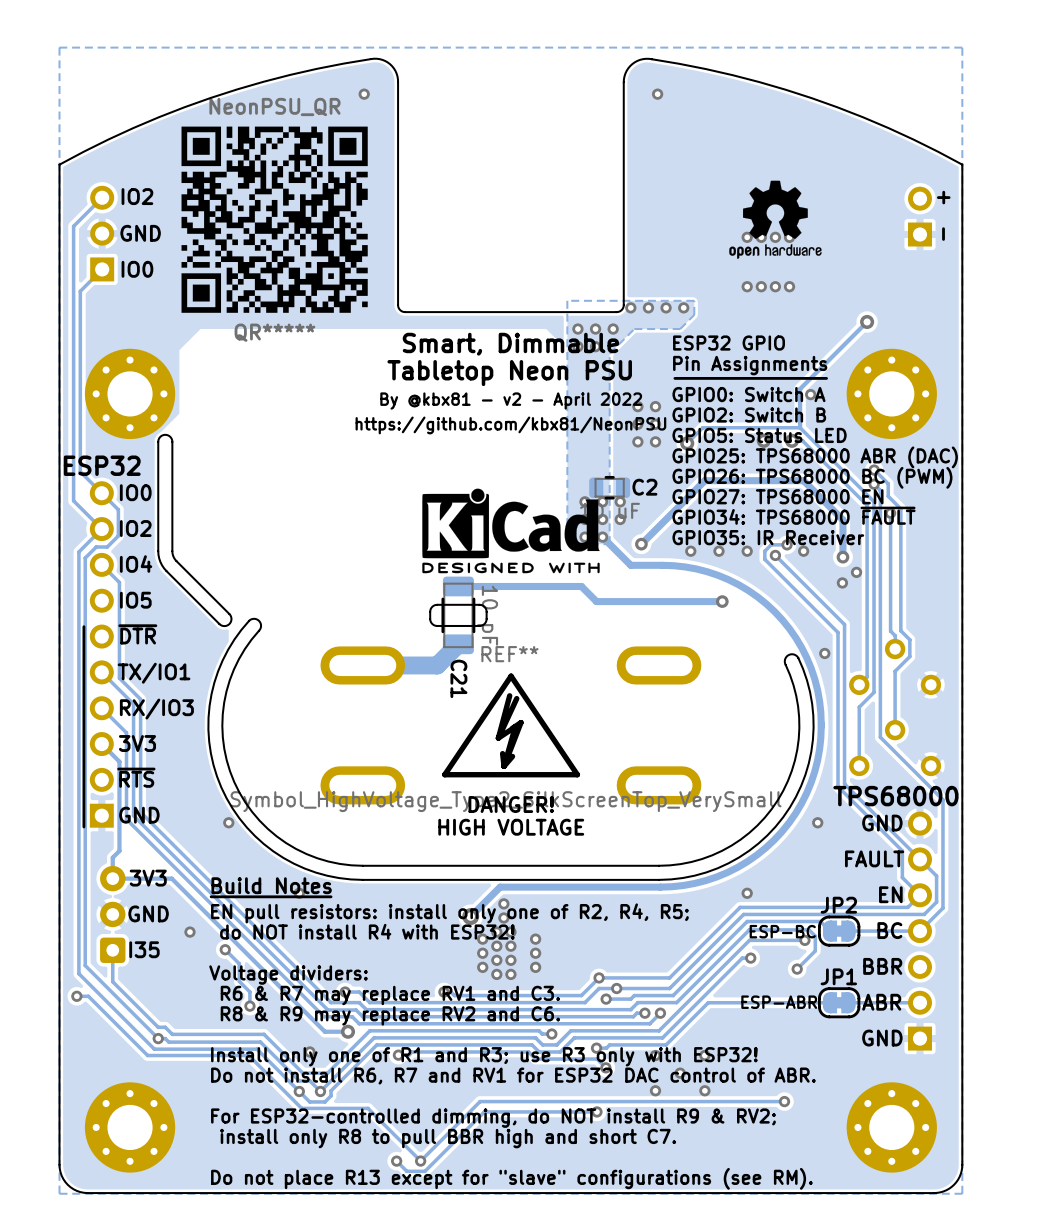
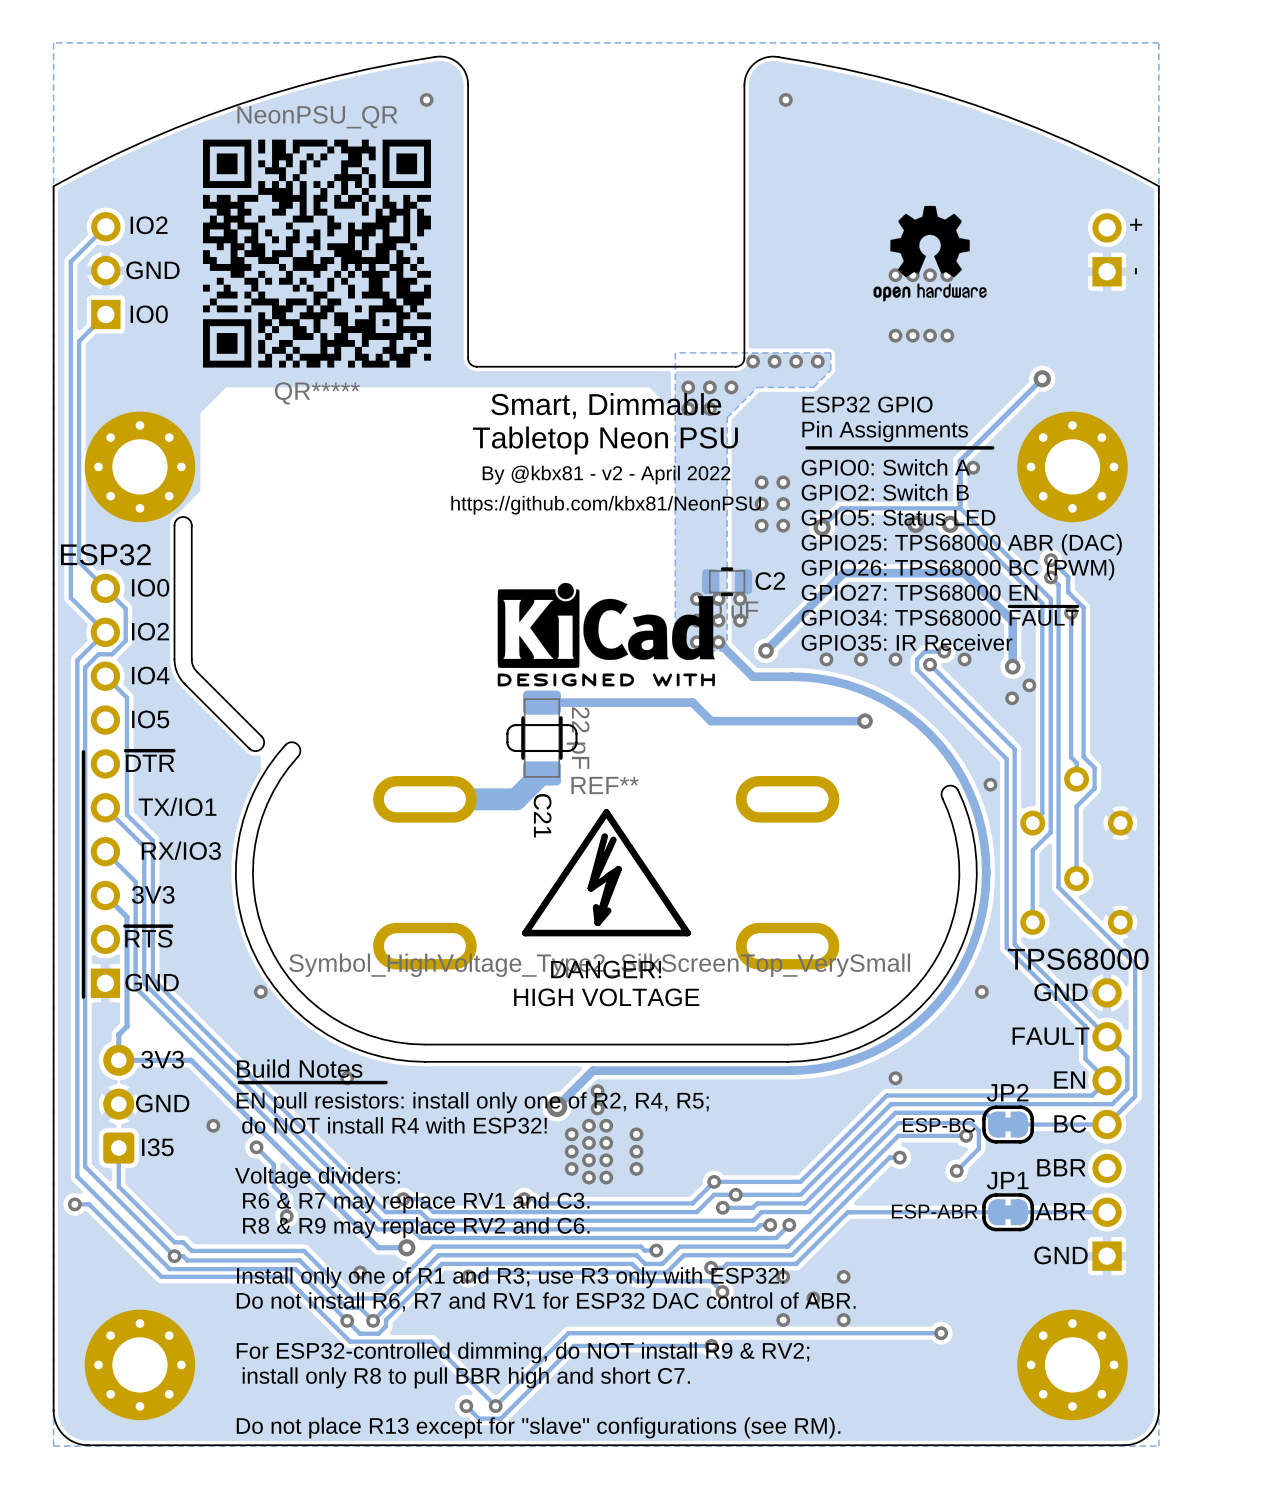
C21 value: 10 pF (487, 615) -> 22 pF (578, 738)

